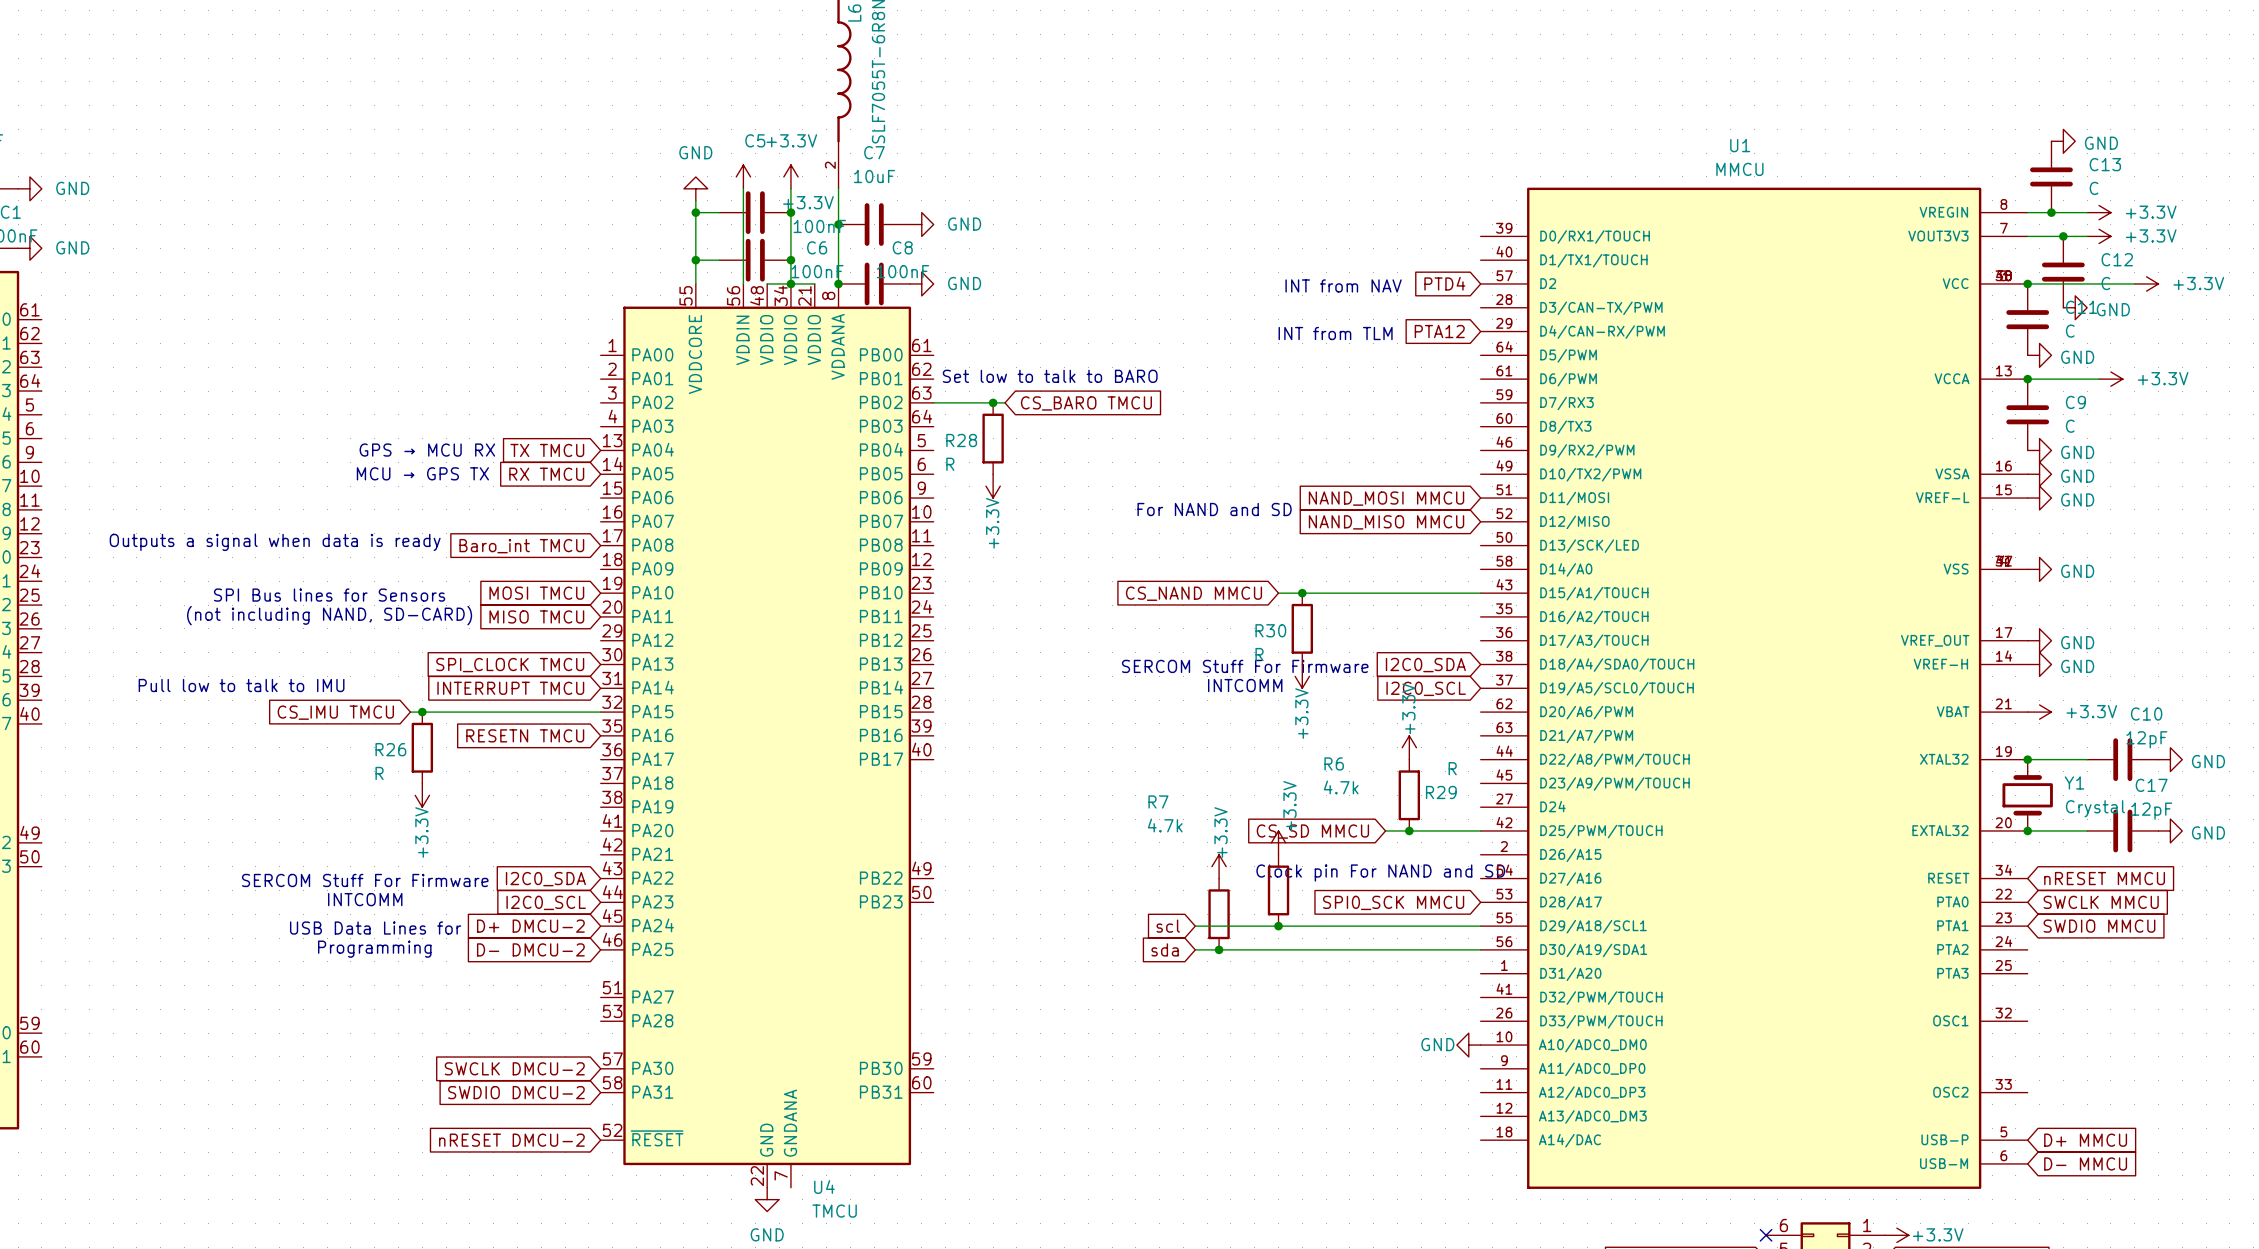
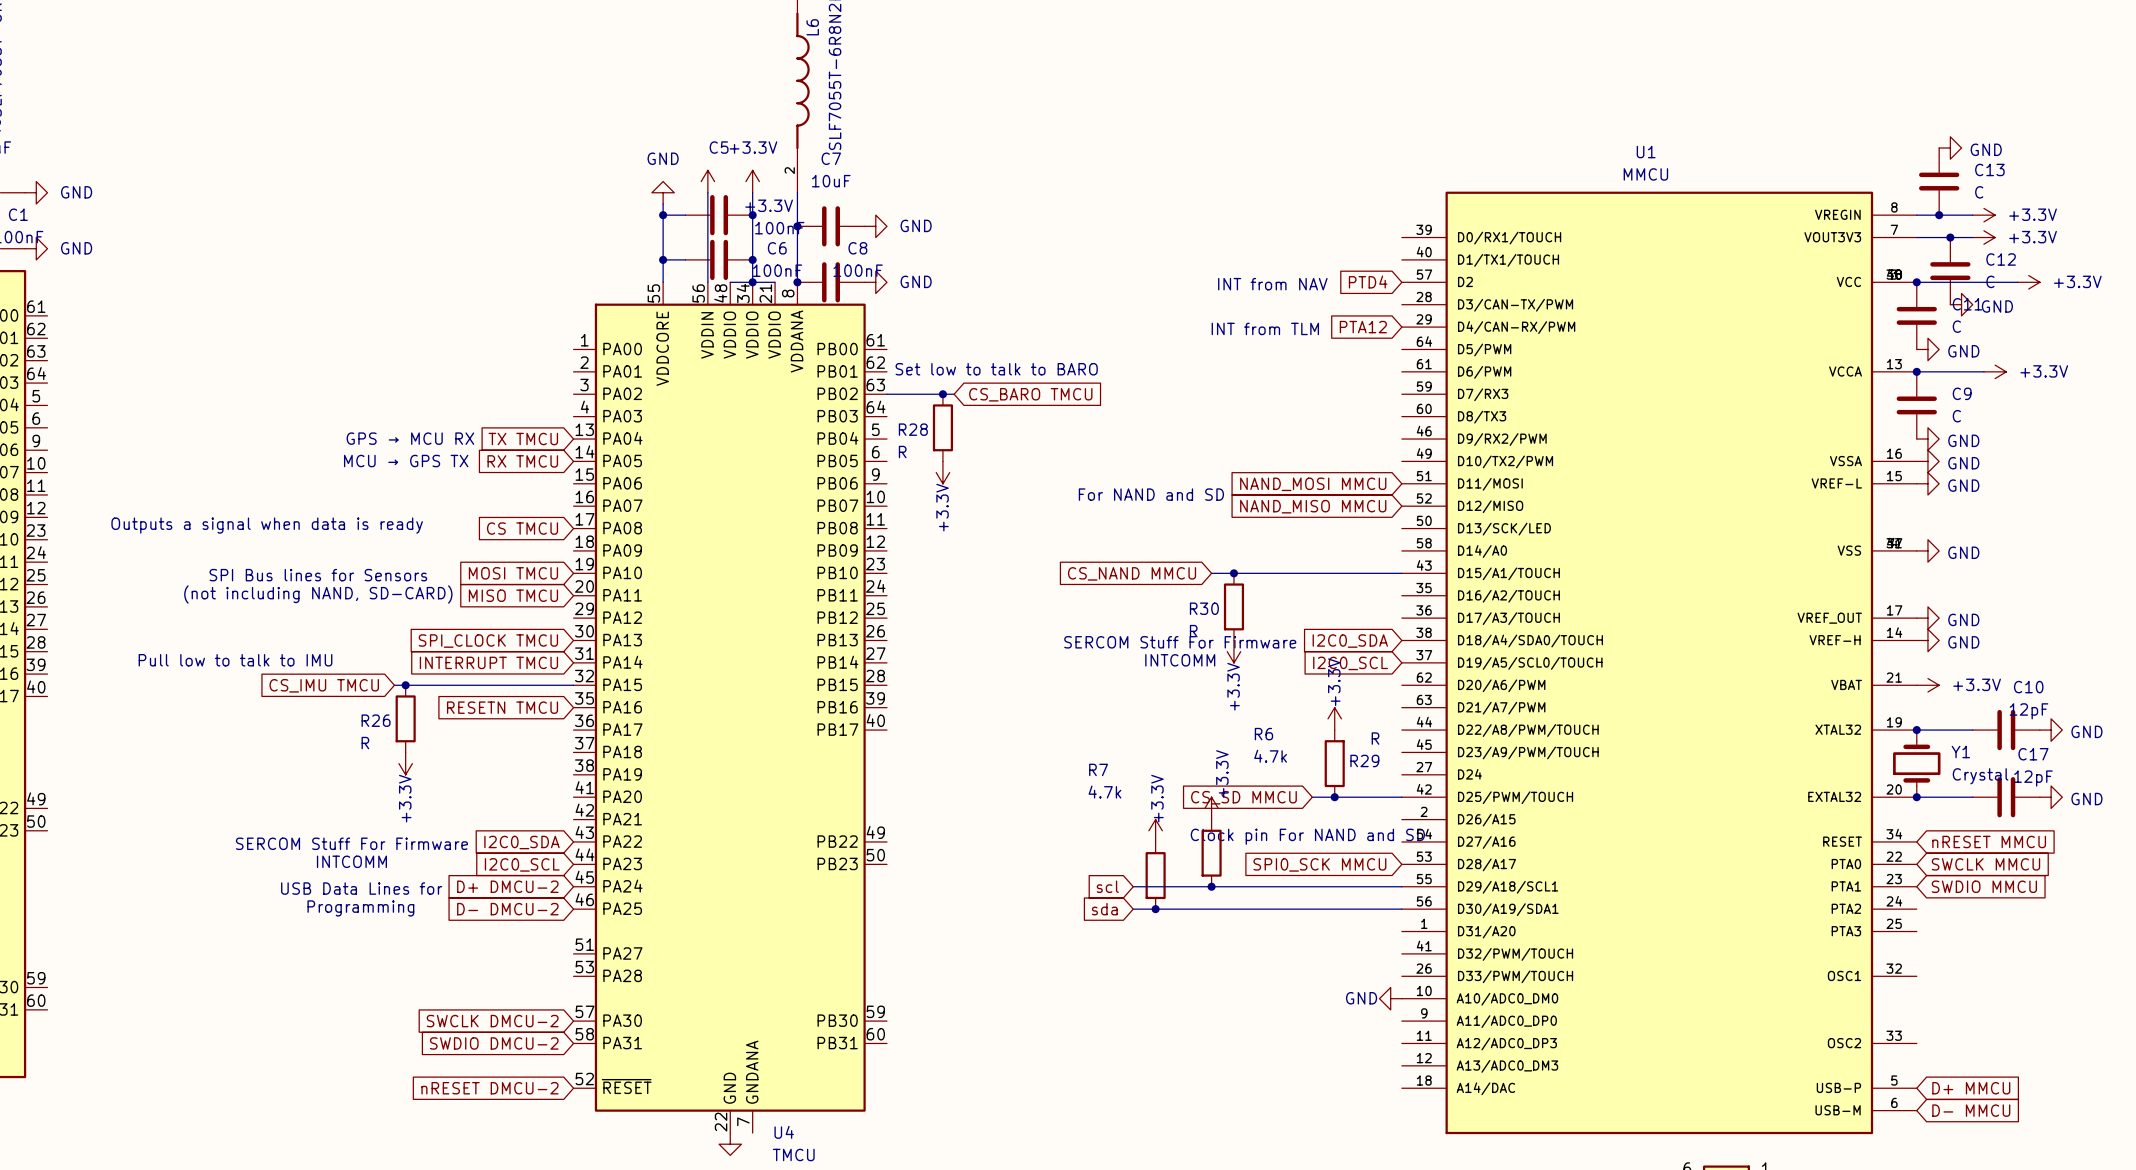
global label: Baro_int TMCU (521, 546) -> CS TMCU (522, 528)

